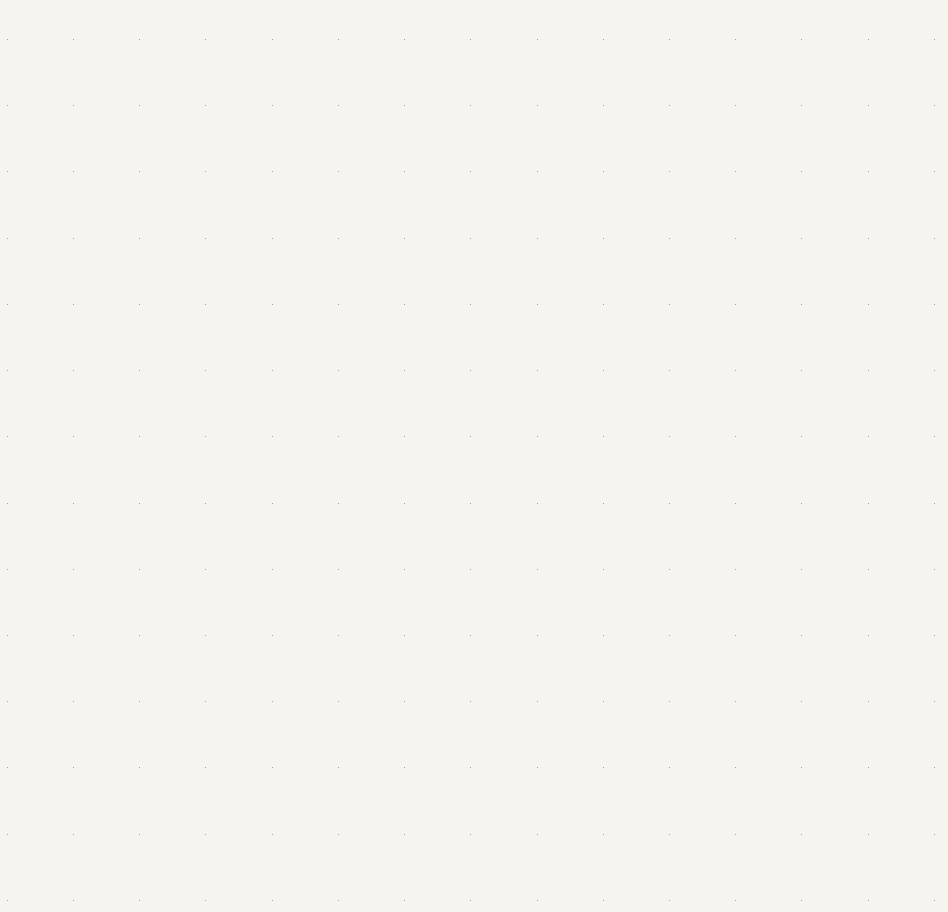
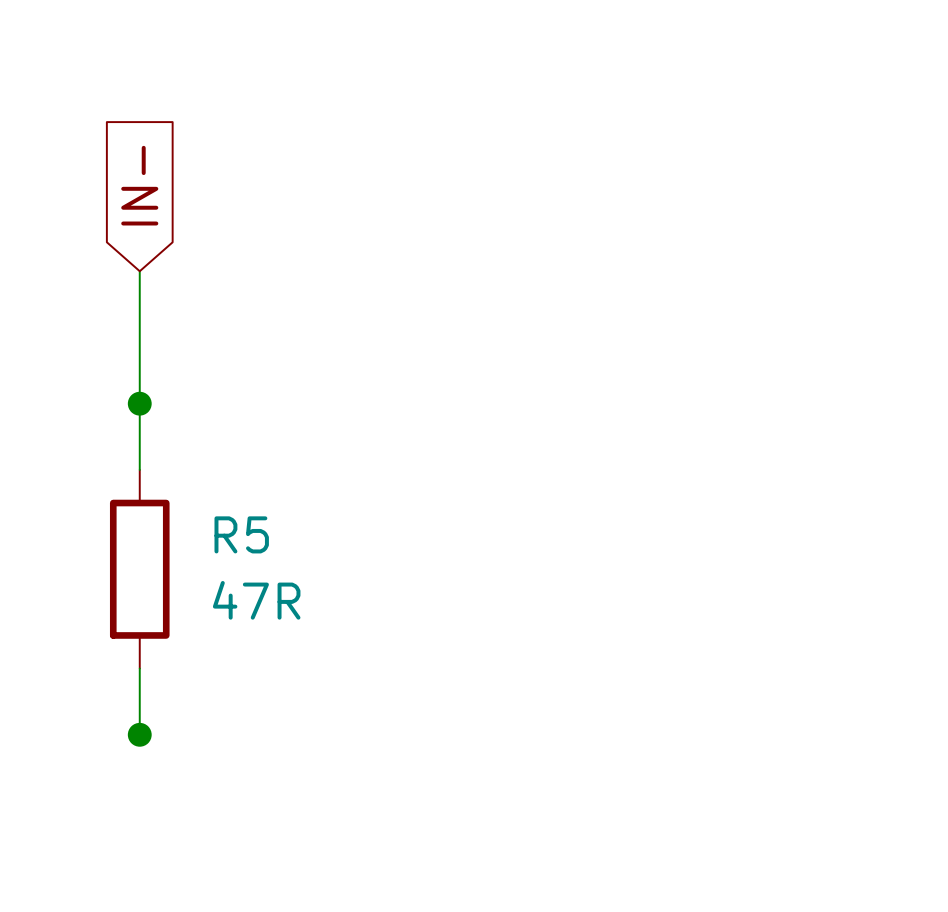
global label: none -> IN- (139, 185)
wire: none -> (139, 271) (139, 469)
junction: none -> (139, 403)
R5: none -> 47R (139, 569)
wire: none -> (139, 668) (139, 734)
junction: none -> (139, 734)

